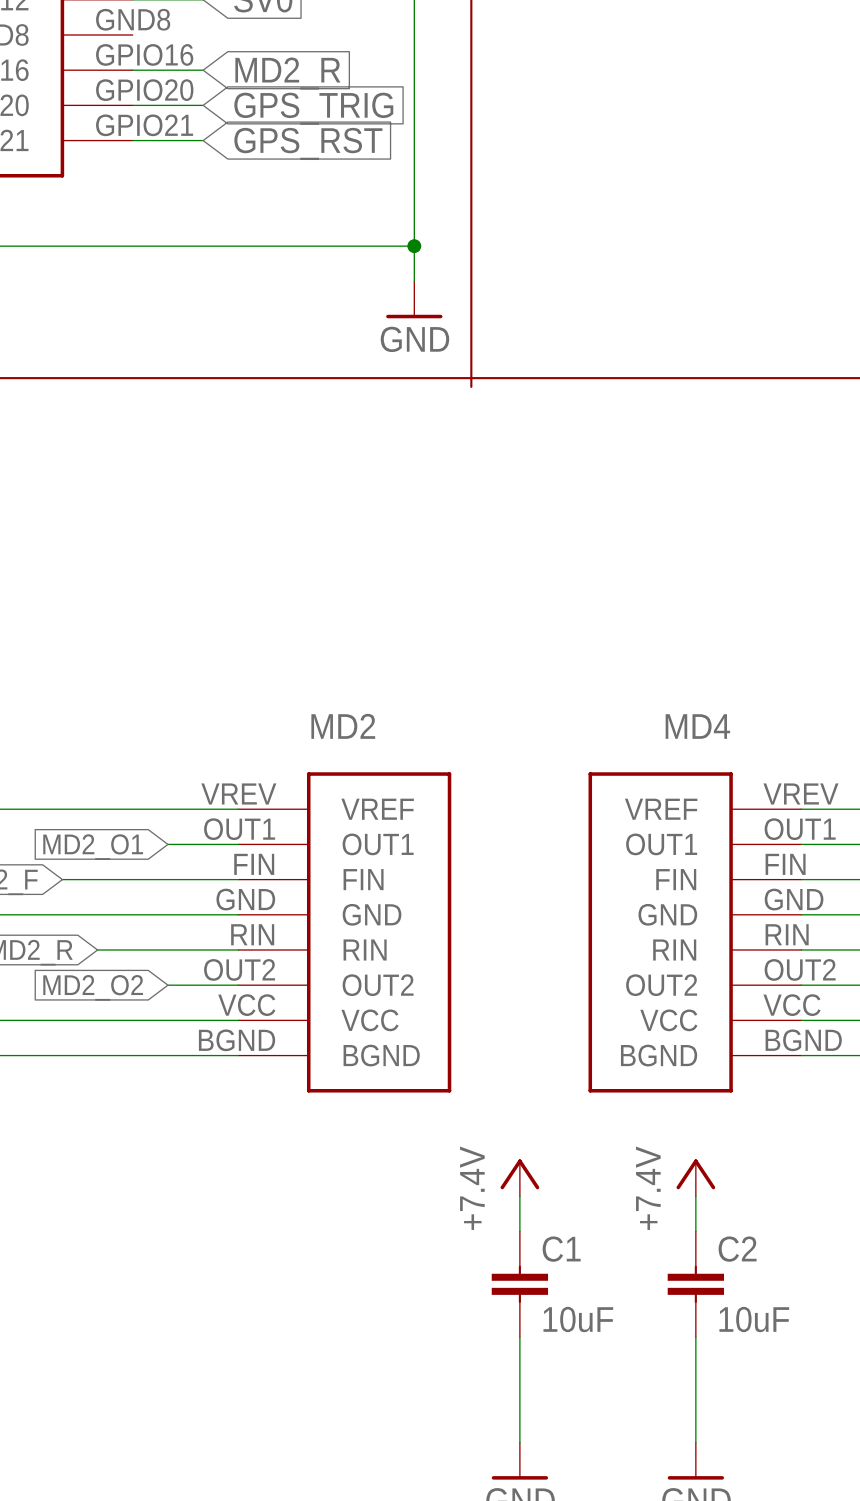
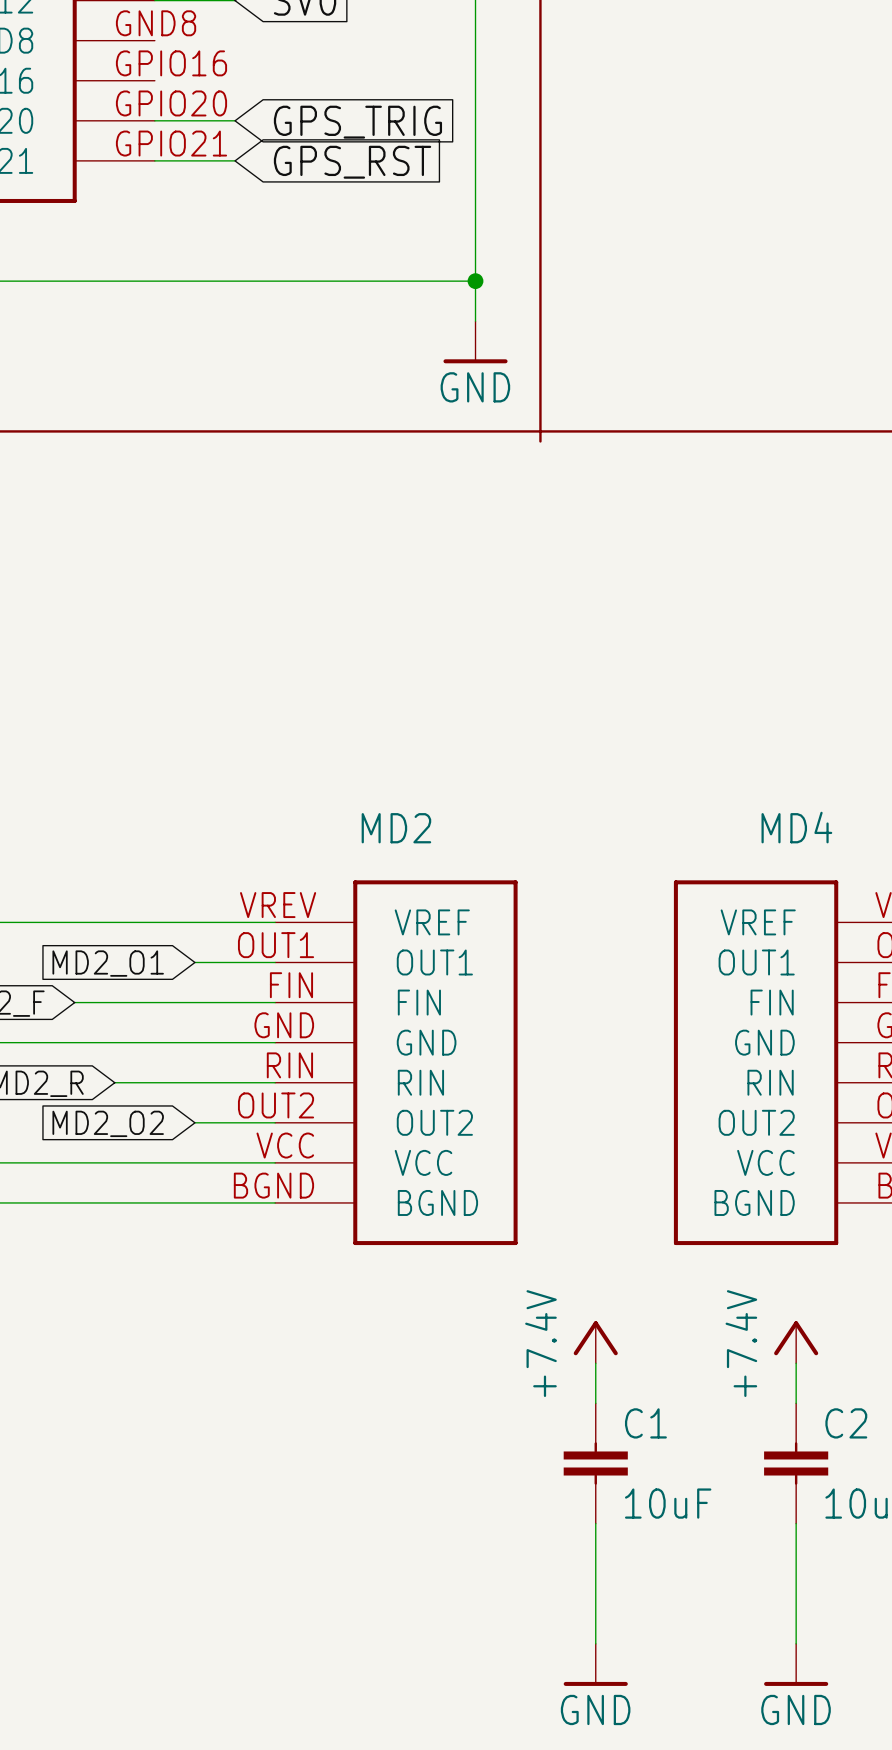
wire: (132, 70) (203, 70) -> none
global label: MD2_R (287, 73) -> none

